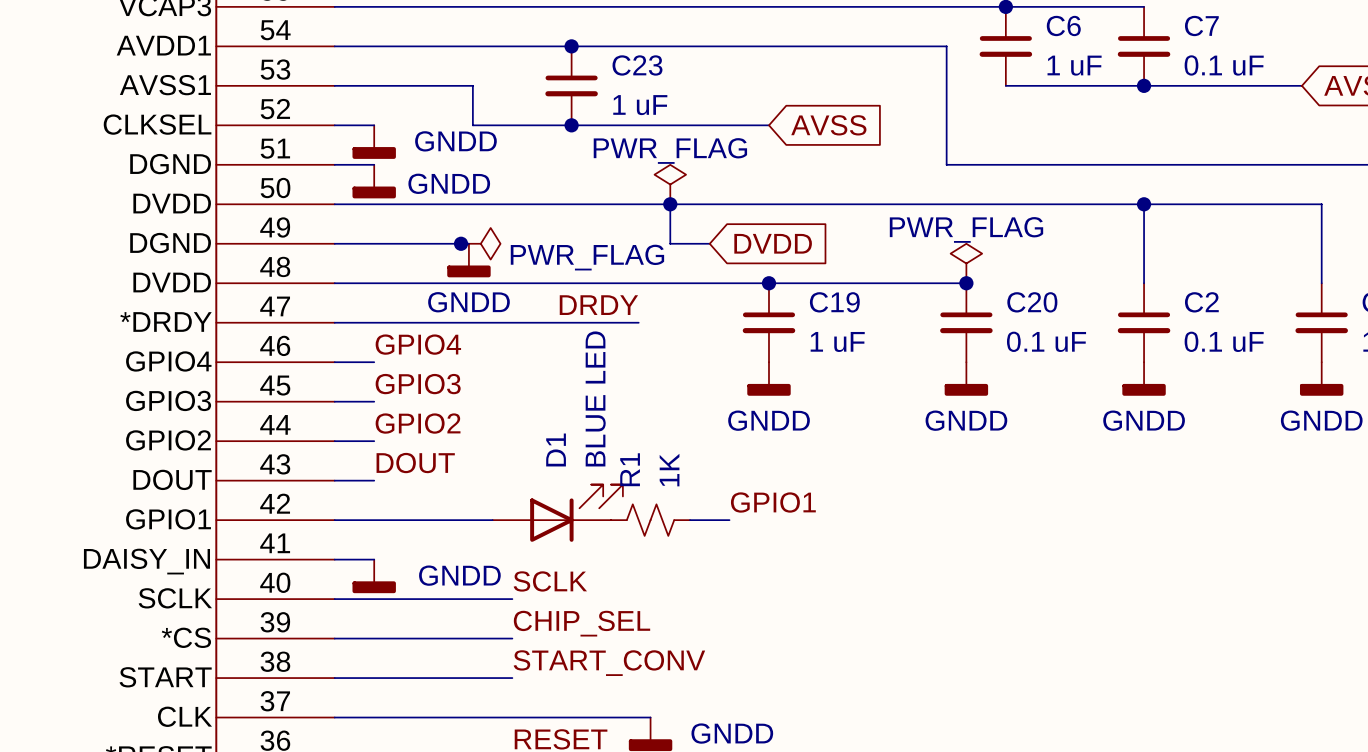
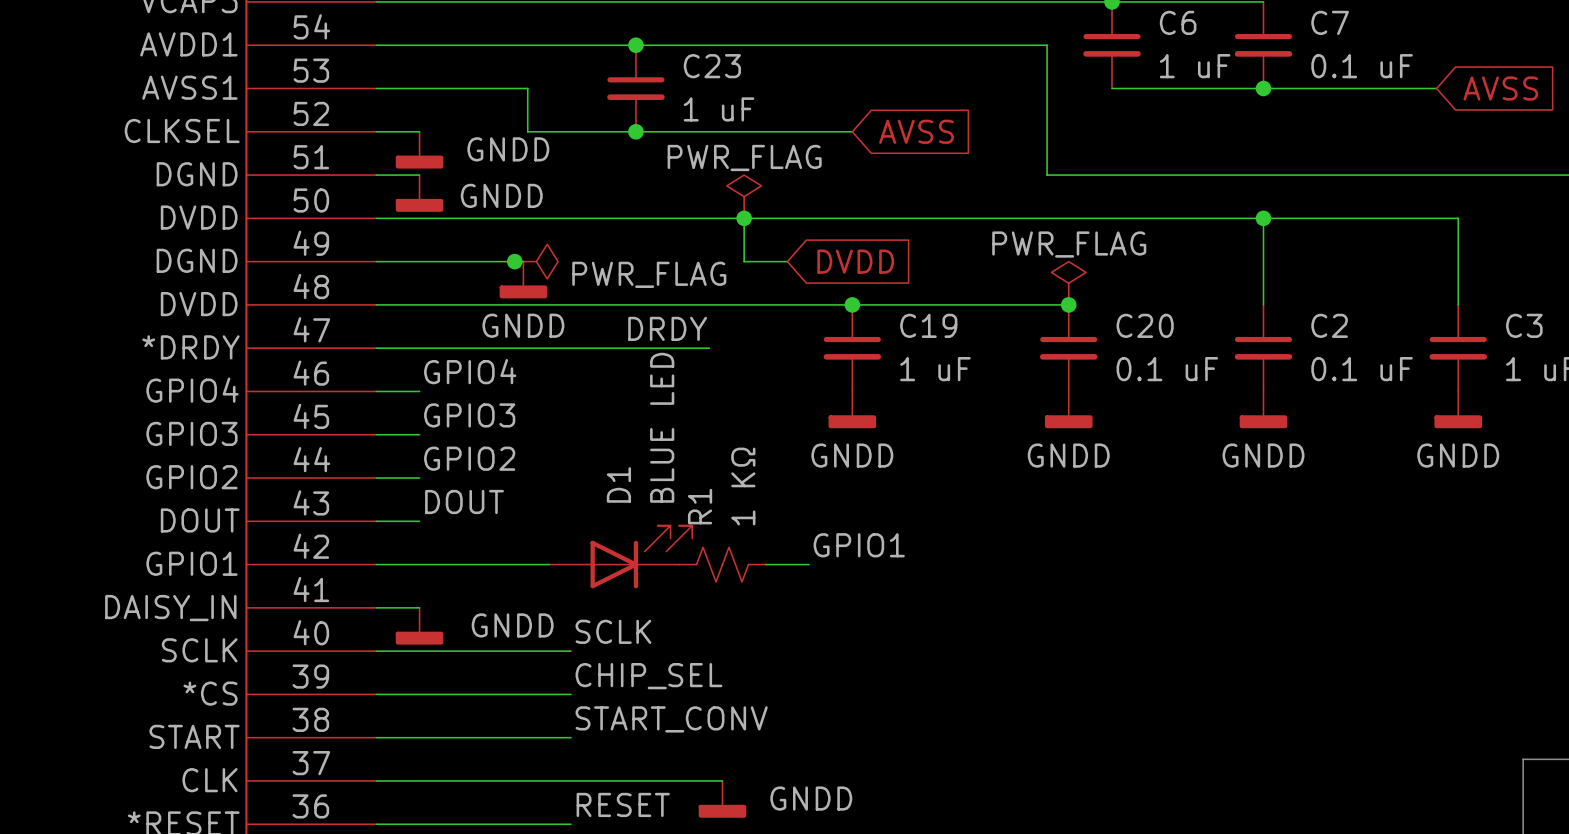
R1 value: 1K (669, 470) -> 1 KΩ (743, 486)

